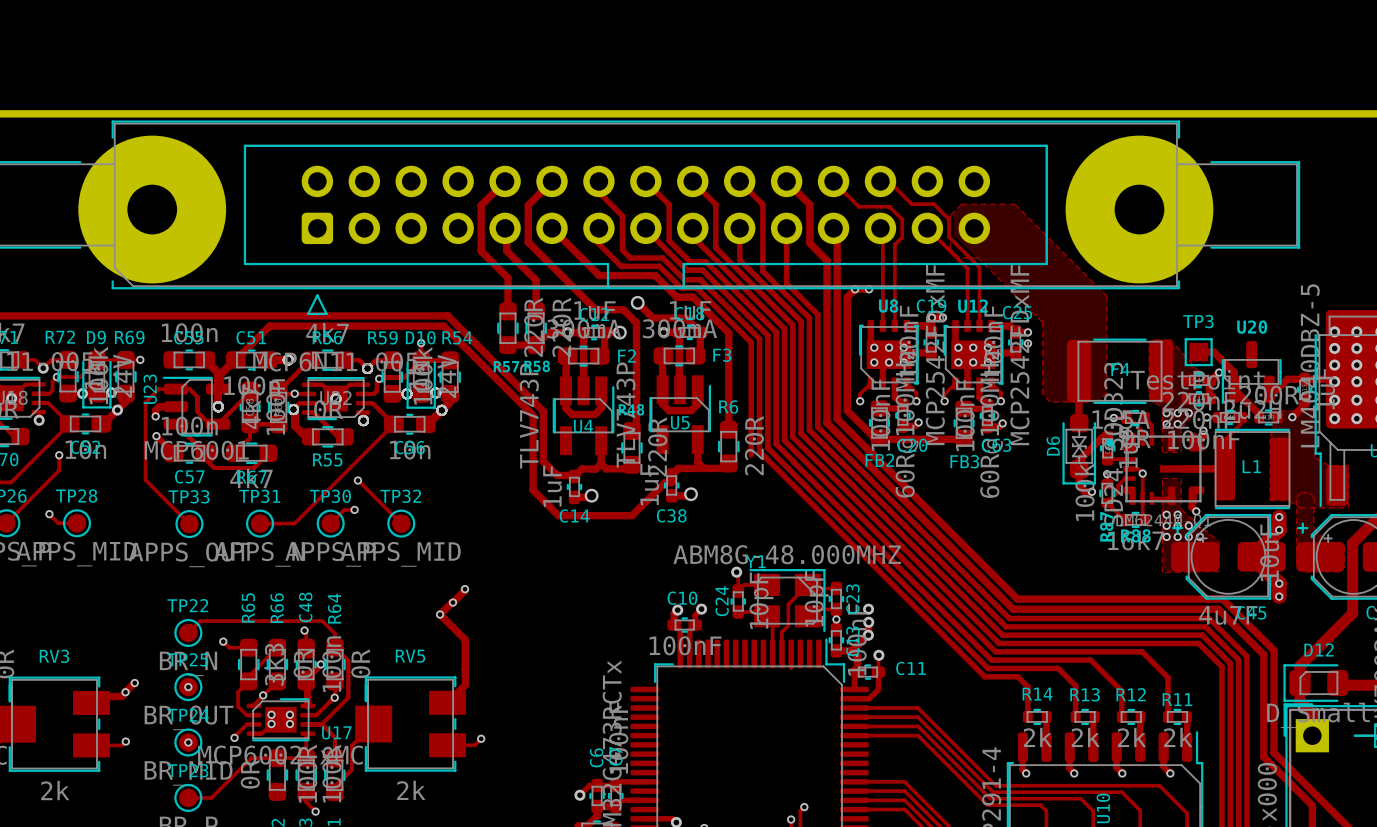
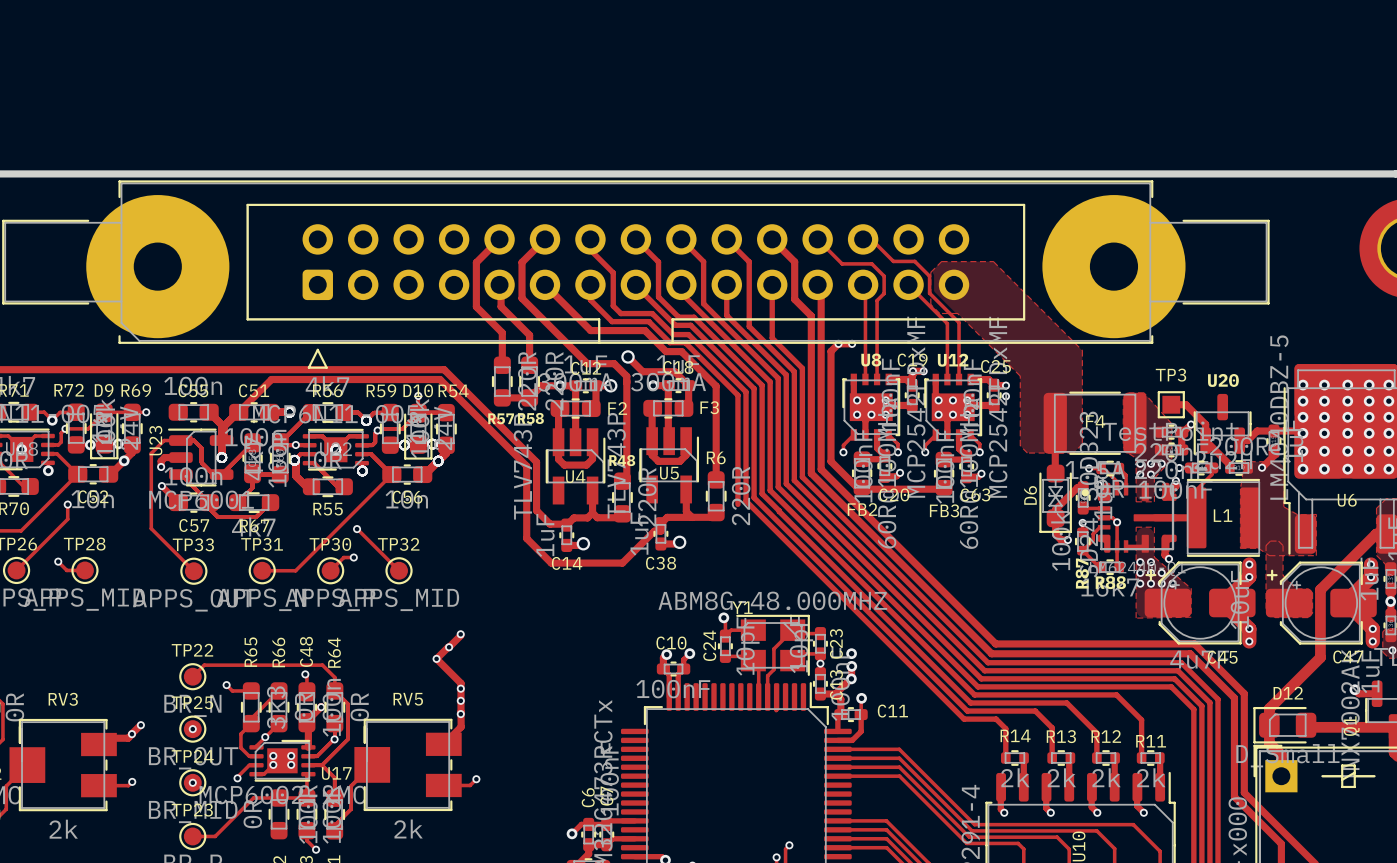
via: none -> (460, 688)
via: none -> (460, 700)
via: none -> (460, 714)

